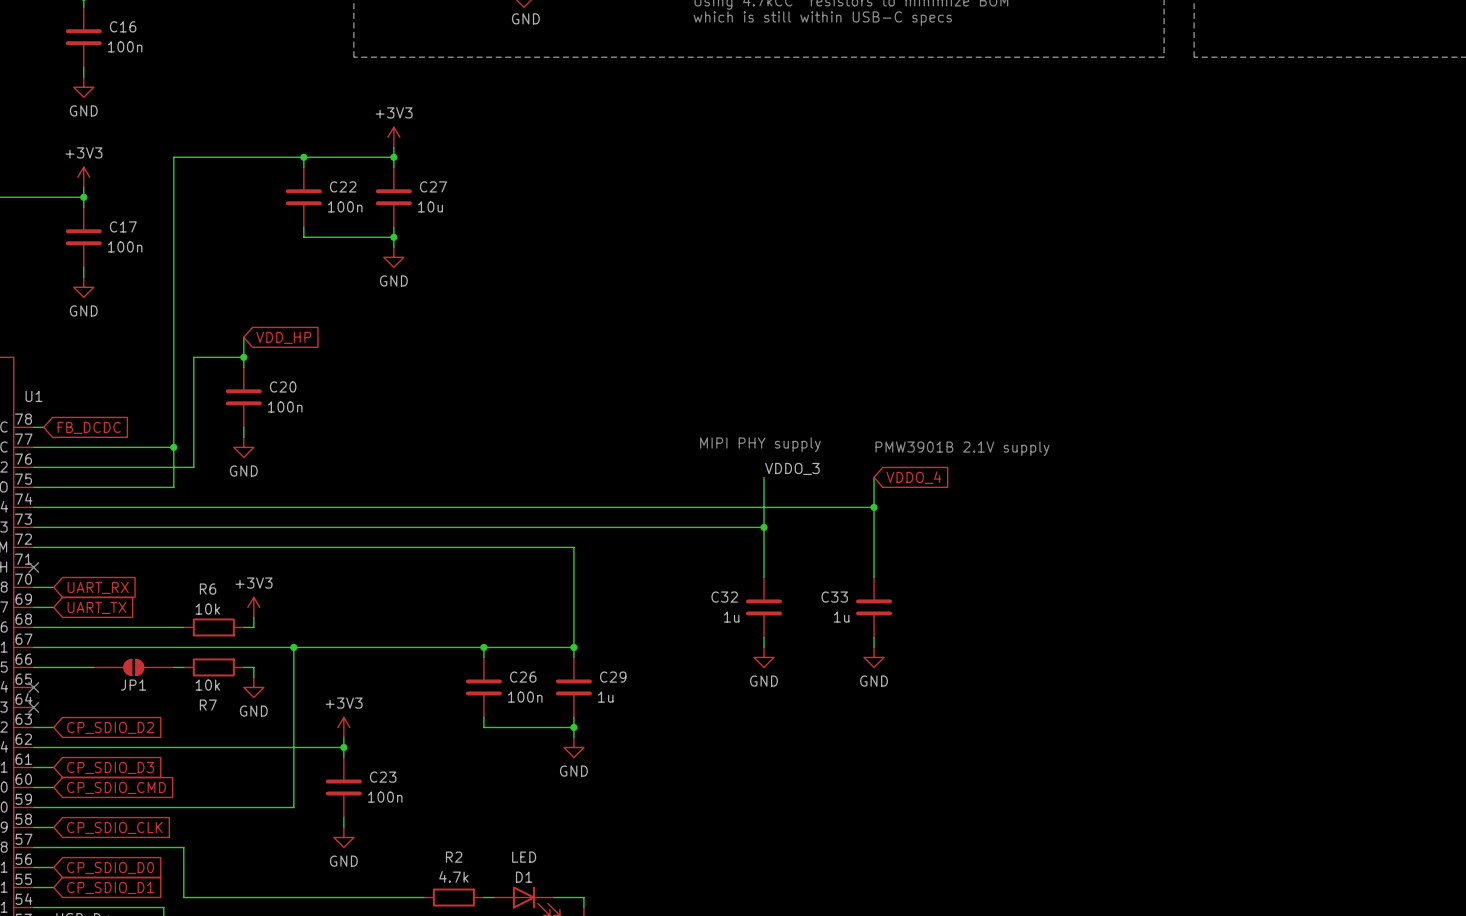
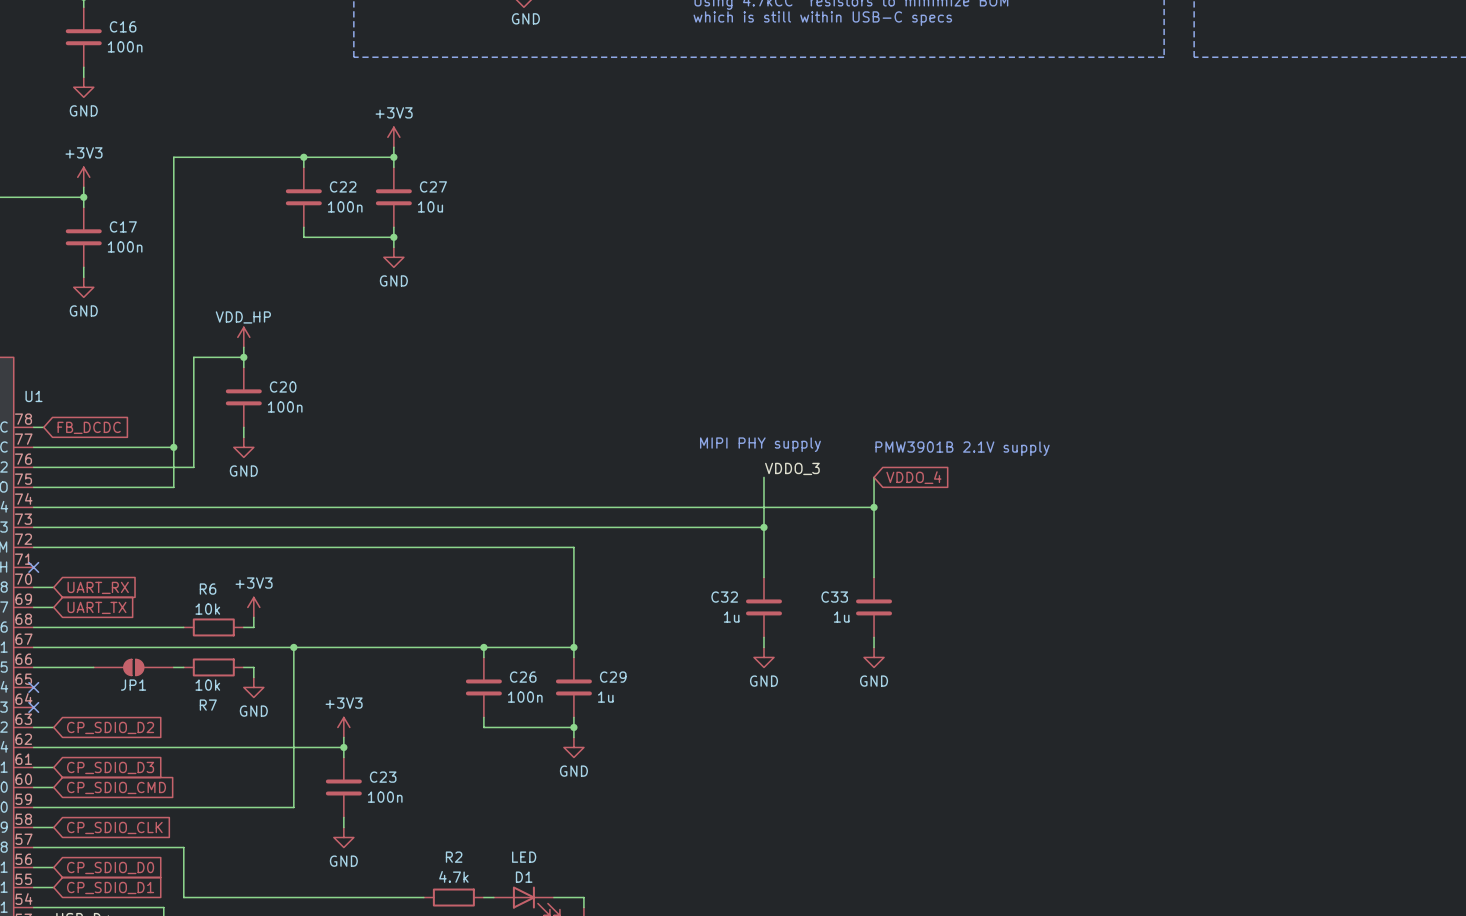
power symbol: none -> VDD_HP (243, 337)
global label: VDD_HP (283, 337) -> none

